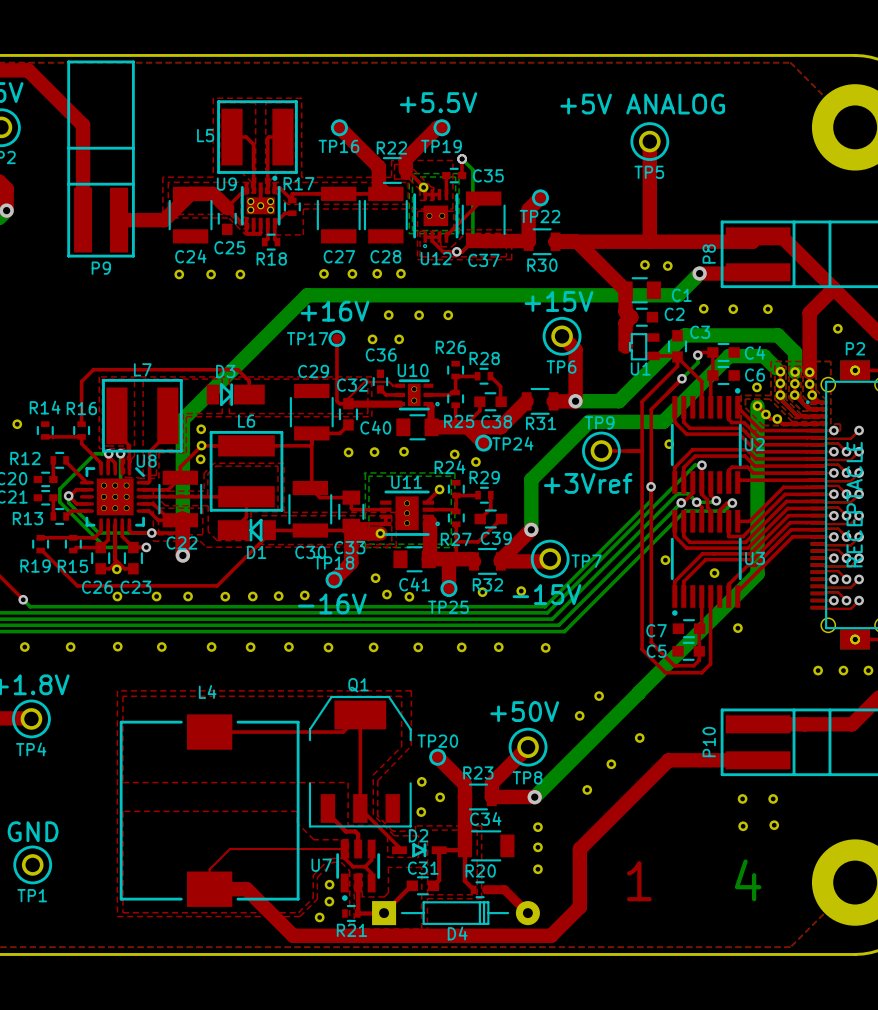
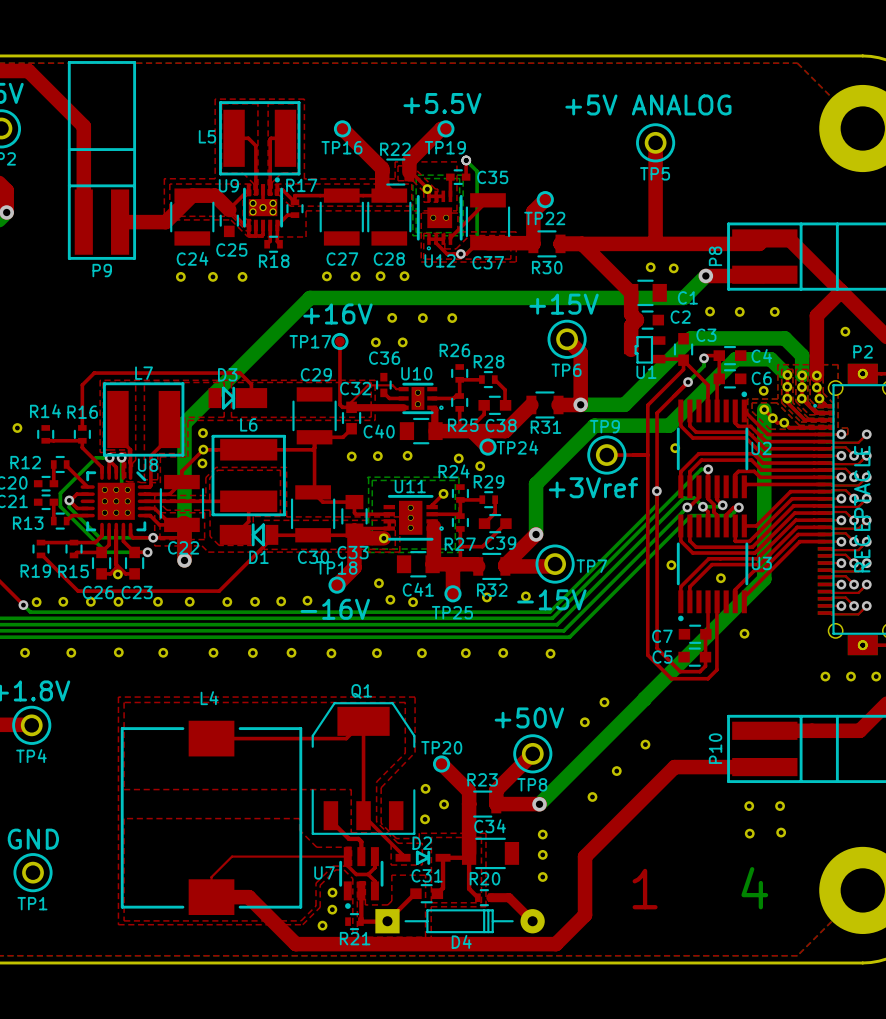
part: none -> (36, 602)
part: none -> (63, 601)
part: none -> (90, 601)

